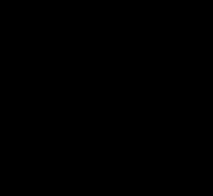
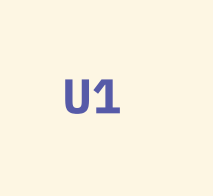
text: none -> U1 (92, 96)

